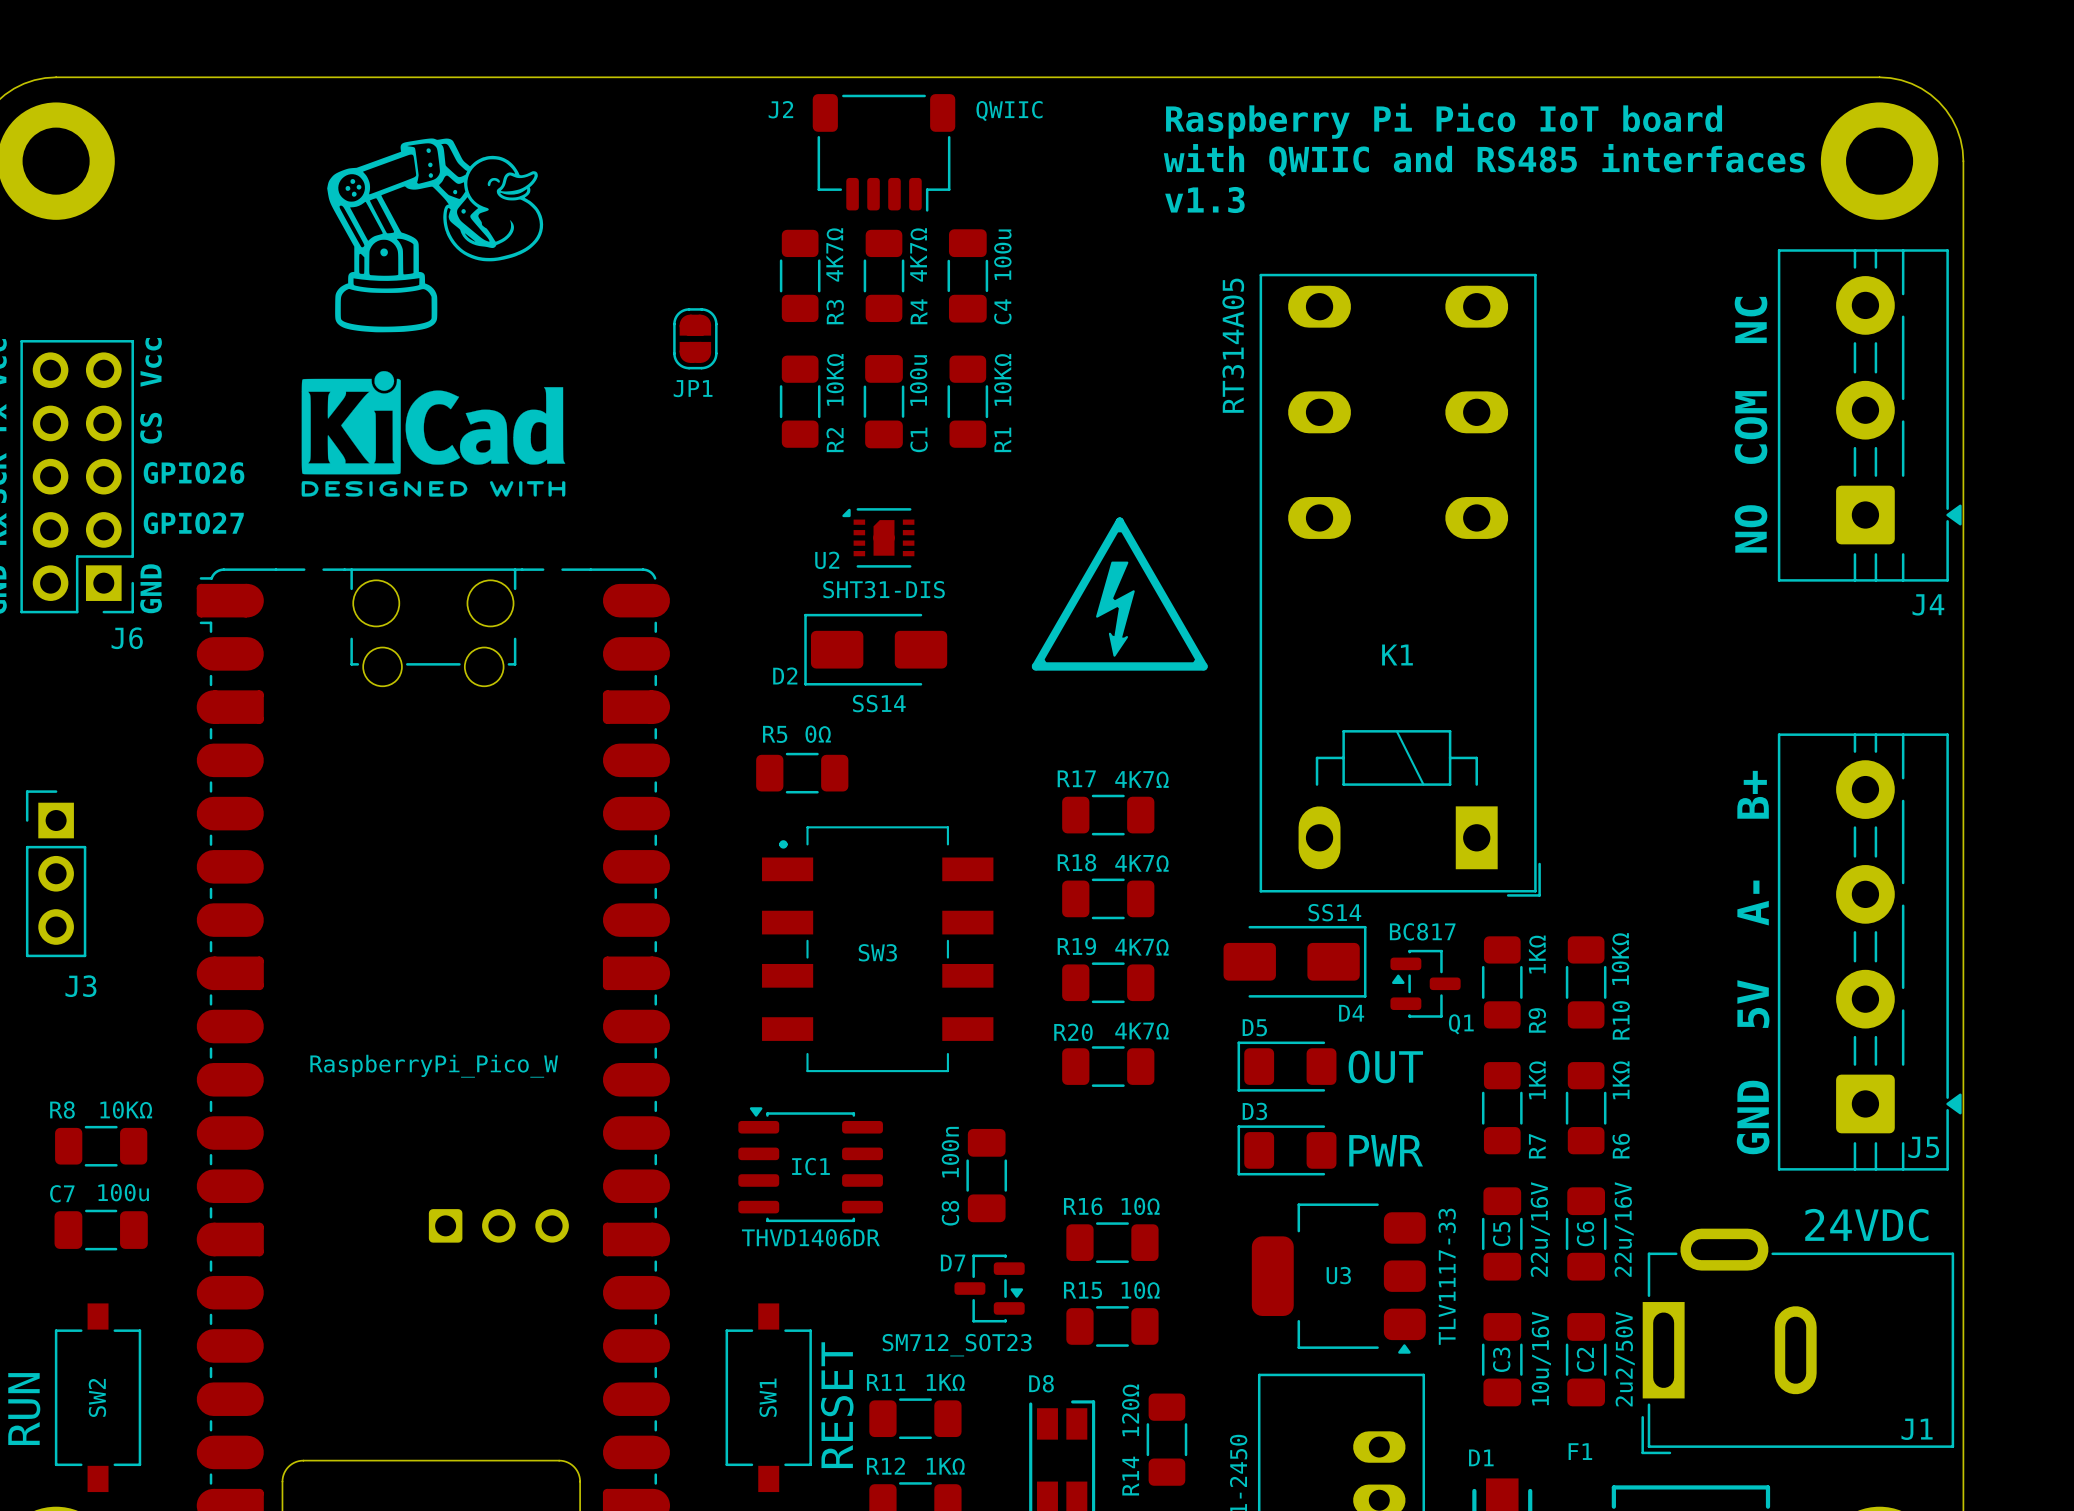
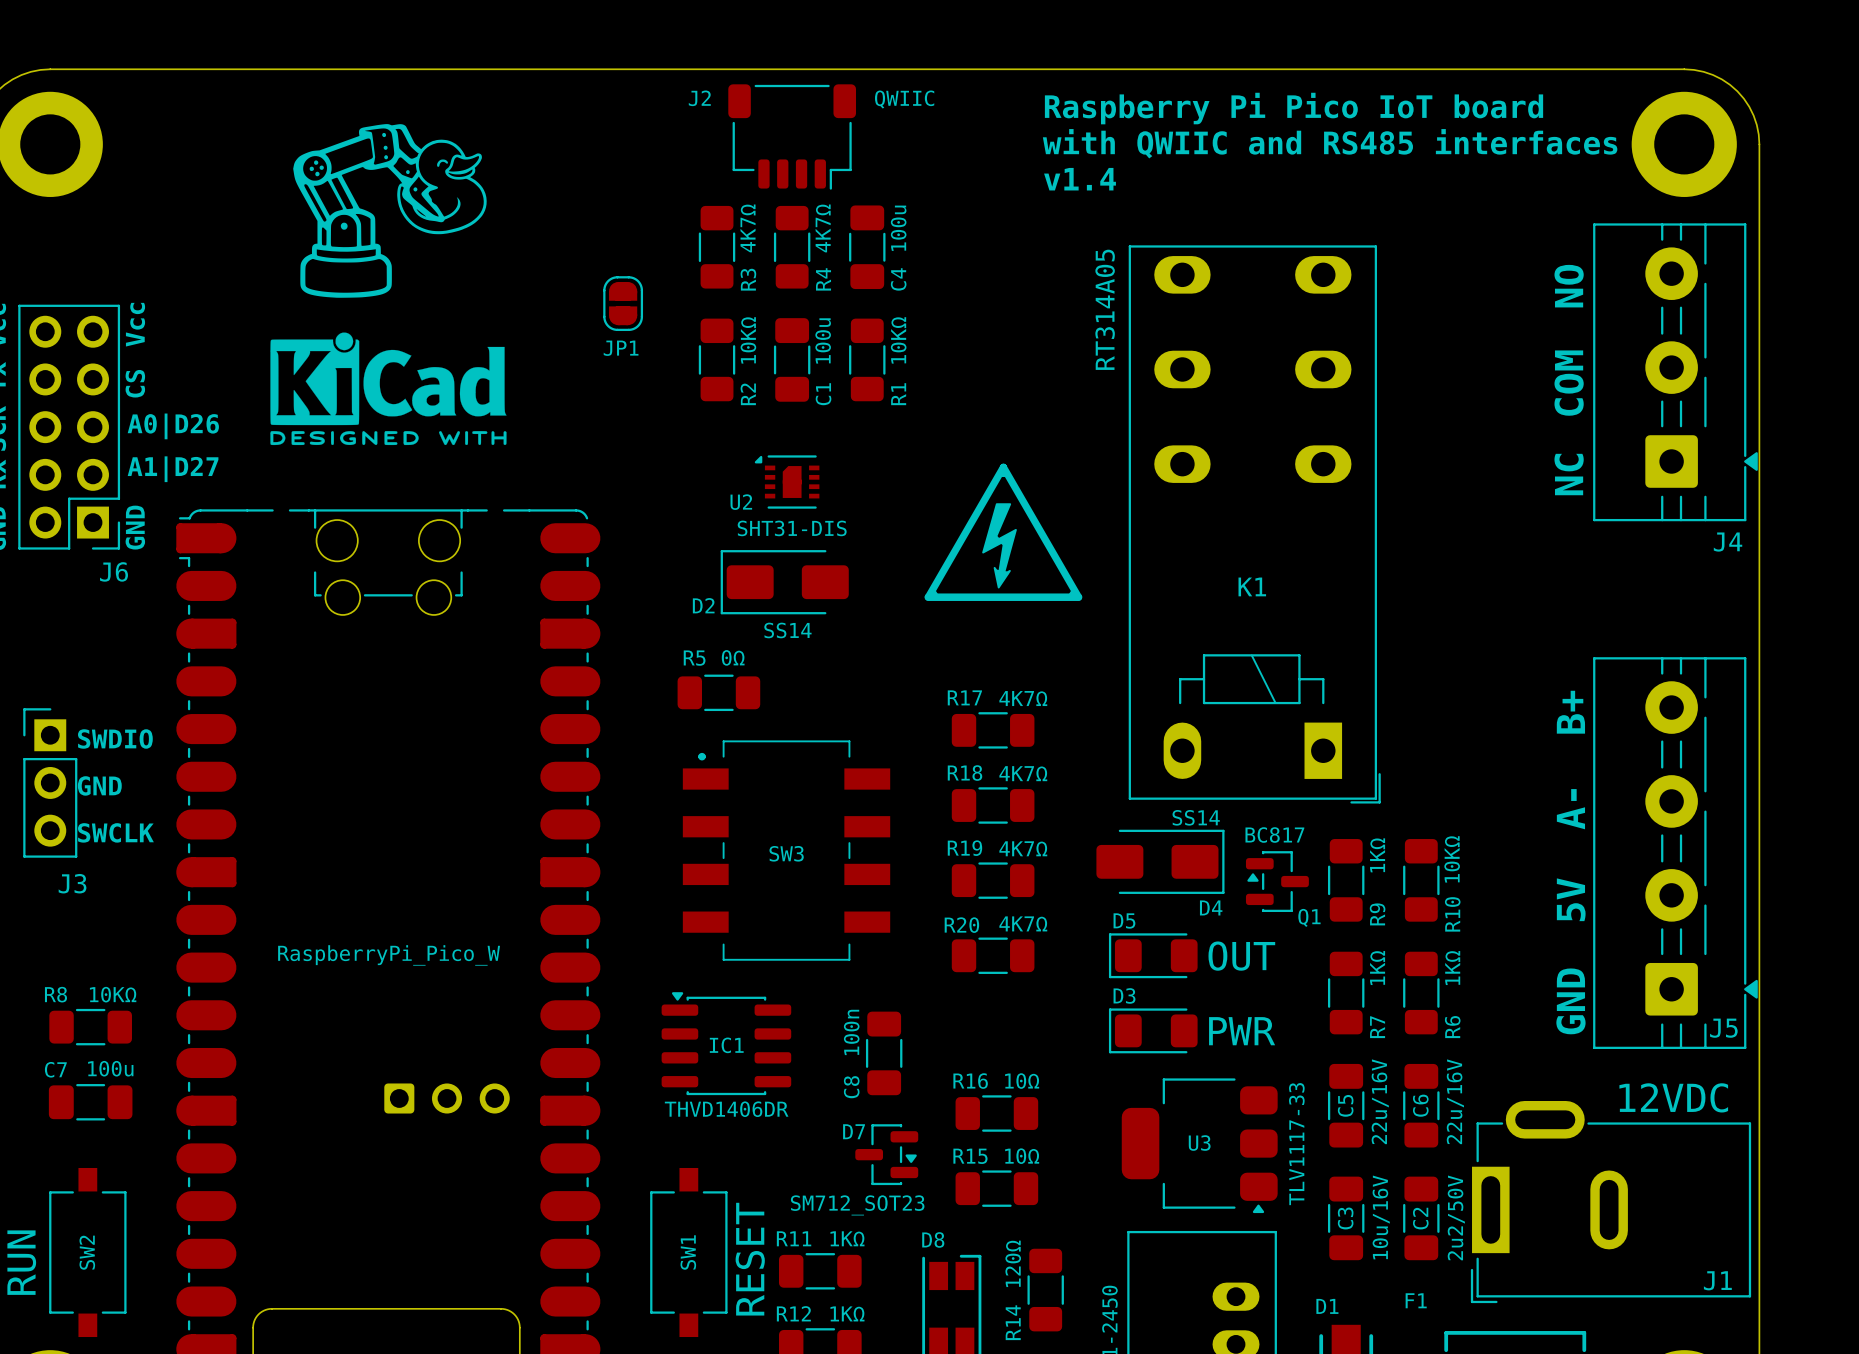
text: v1.3 (1204, 200) -> v1.4 (1080, 179)
text: NC (1751, 319) -> NO (1569, 286)
text: GPIO26 (194, 472) -> A0|D26 (173, 426)
text: GPIO27 (193, 523) -> A1|D27 (173, 469)
text: NO (1751, 528) -> NC (1569, 474)
text: none -> SWDIO (115, 738)
text: none -> GND (99, 785)
text: none -> SWCLK (115, 832)
text: 24VDC (1866, 1225) -> 12VDC (1673, 1097)

